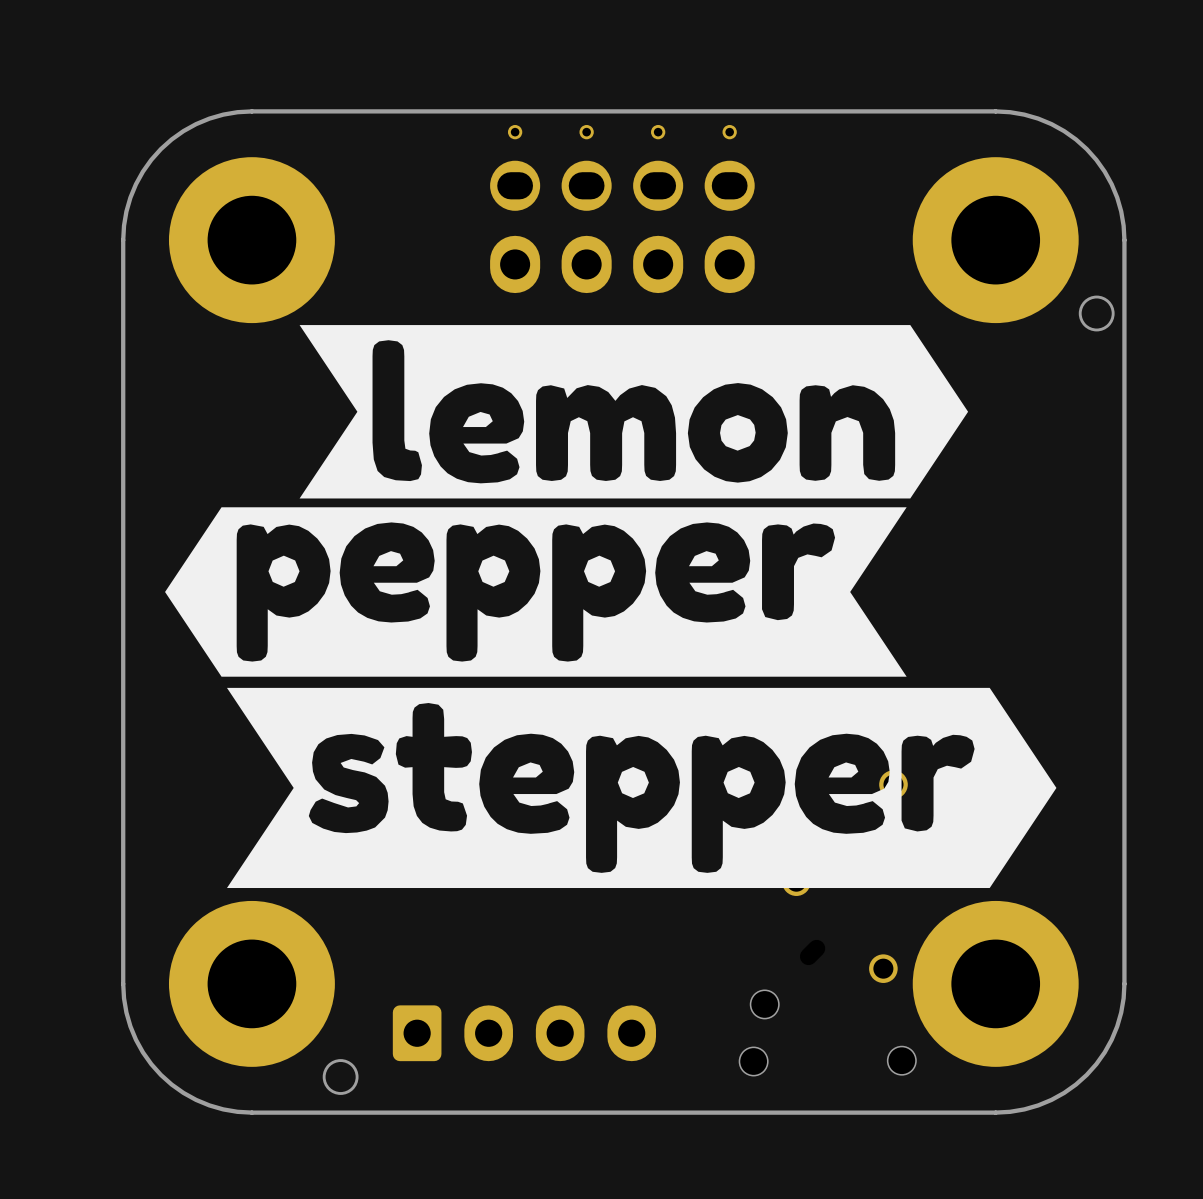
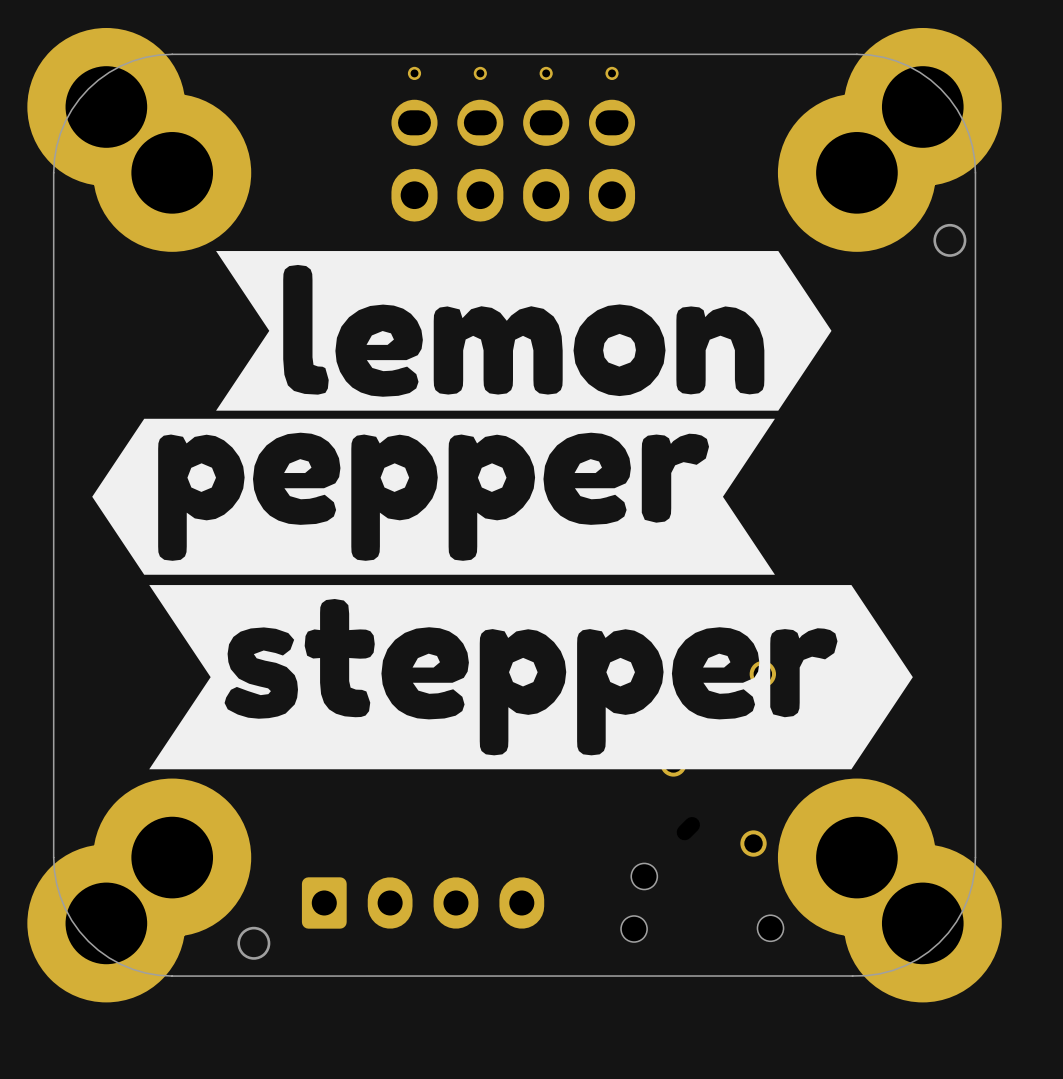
part footprint: [121, 109, 1127, 1115] -> [27, 27, 1002, 1003]

